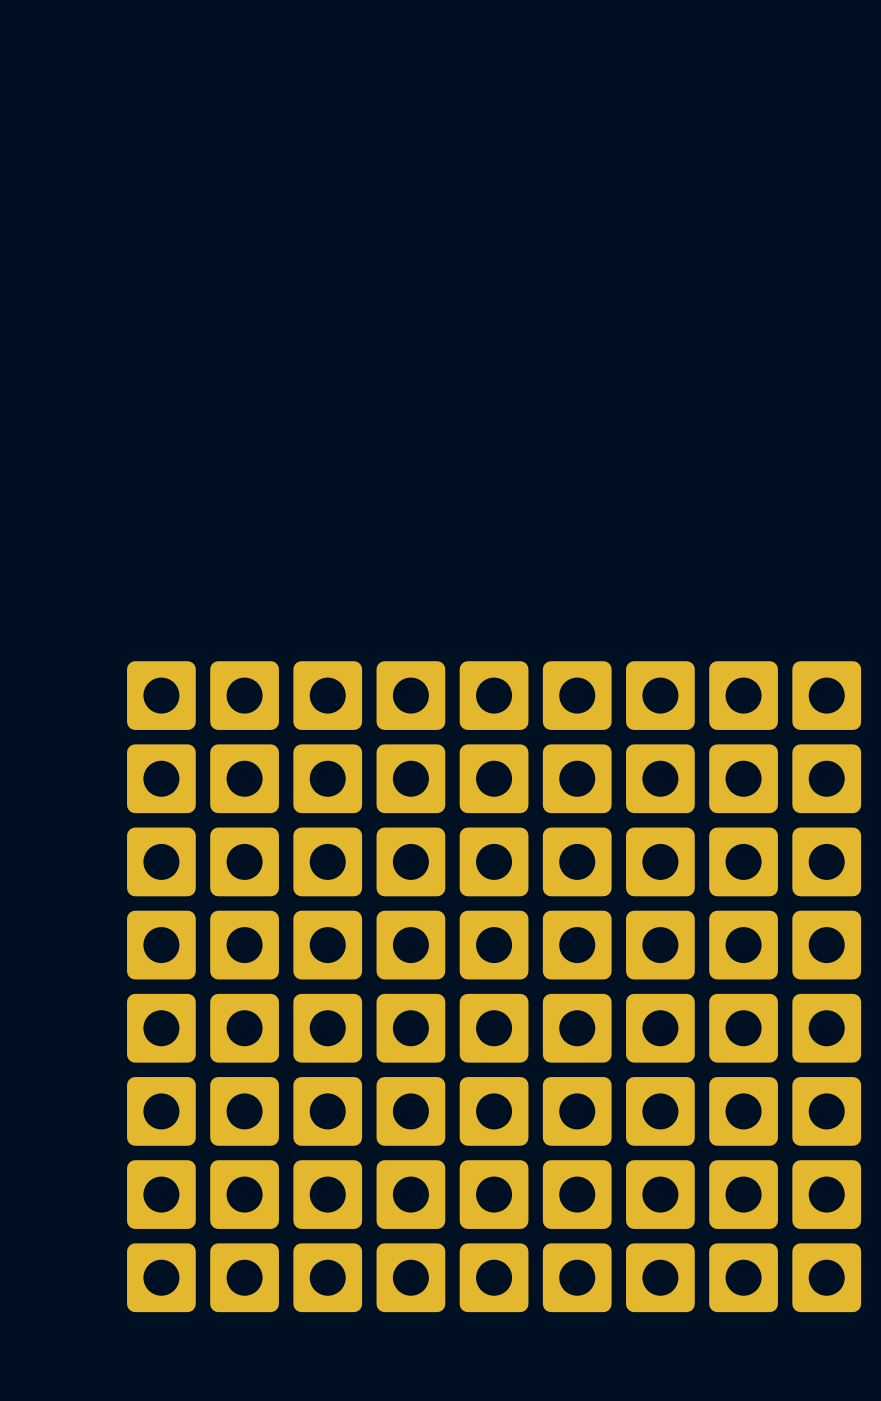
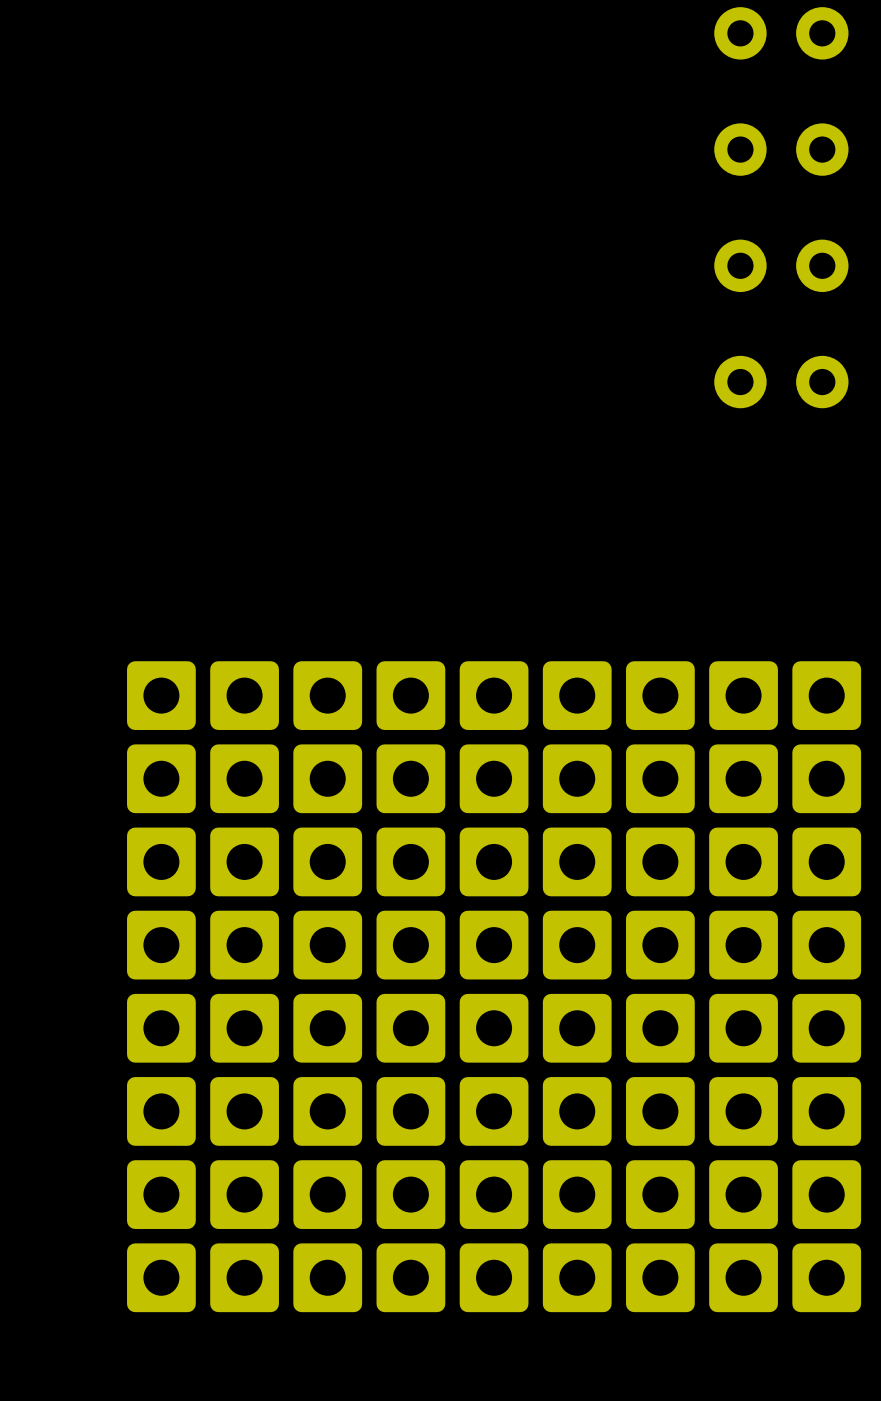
part: none -> (781, 33)
part: none -> (781, 149)
part: none -> (781, 265)
part: none -> (781, 382)

